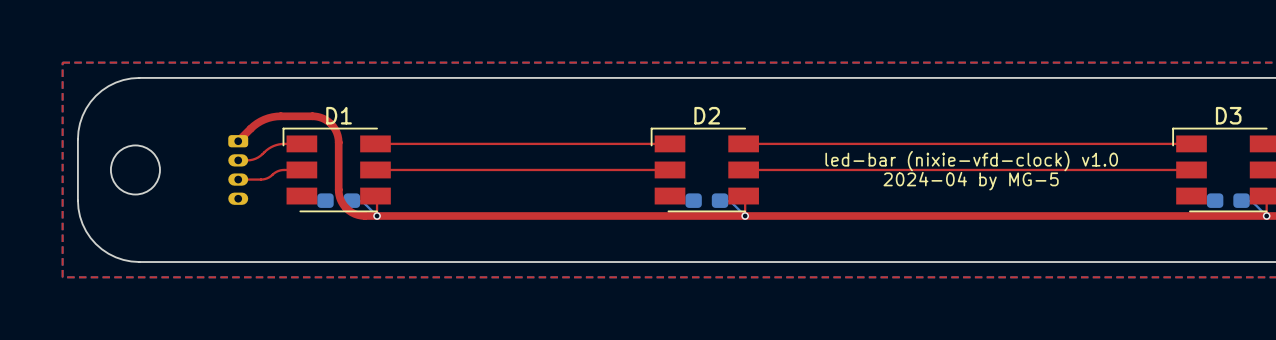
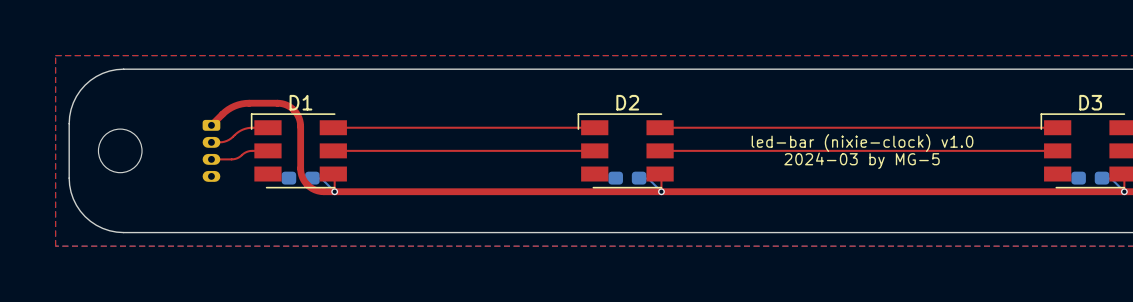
text: led-bar (nixie-vfd-clock) v1.0 (971, 161) -> led-bar (nixie-clock) v1.0 (862, 143)
text: 2024-04 by MG-5 (971, 181) -> 2024-03 by MG-5 (862, 160)

